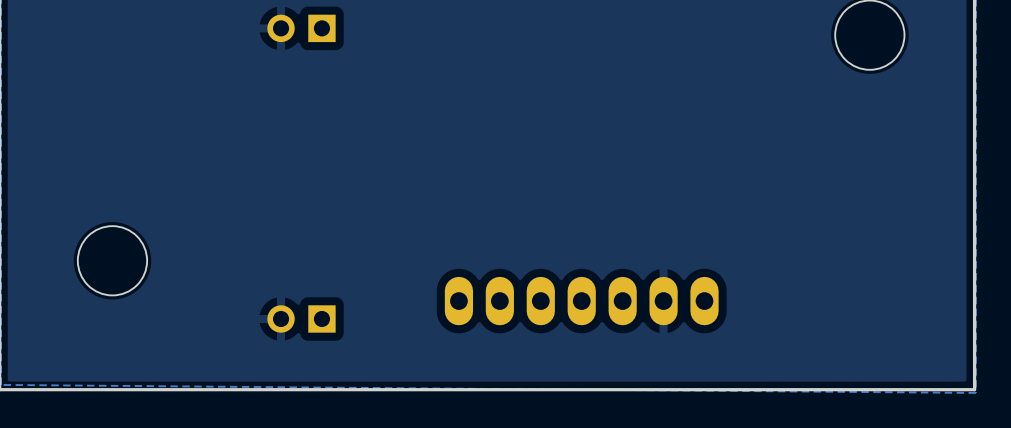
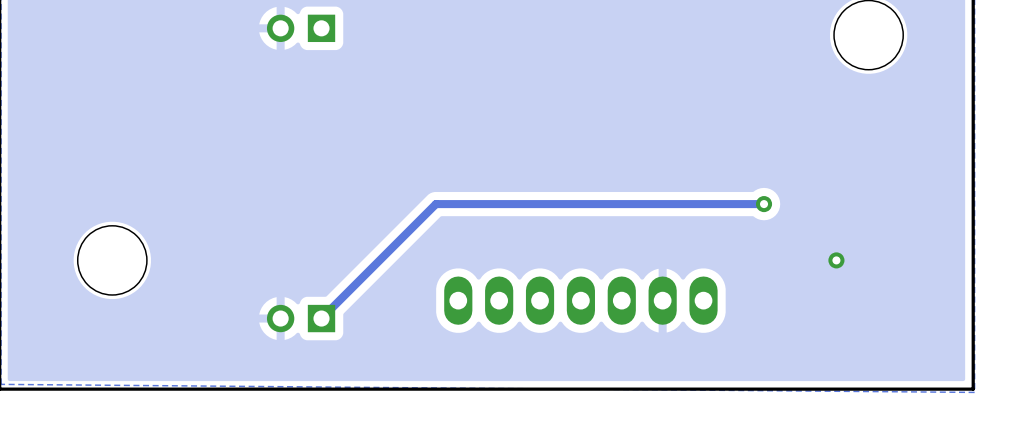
track: none -> (764, 204) (435, 204) (321, 318)
via: none -> (764, 204)
via: none -> (836, 260)

